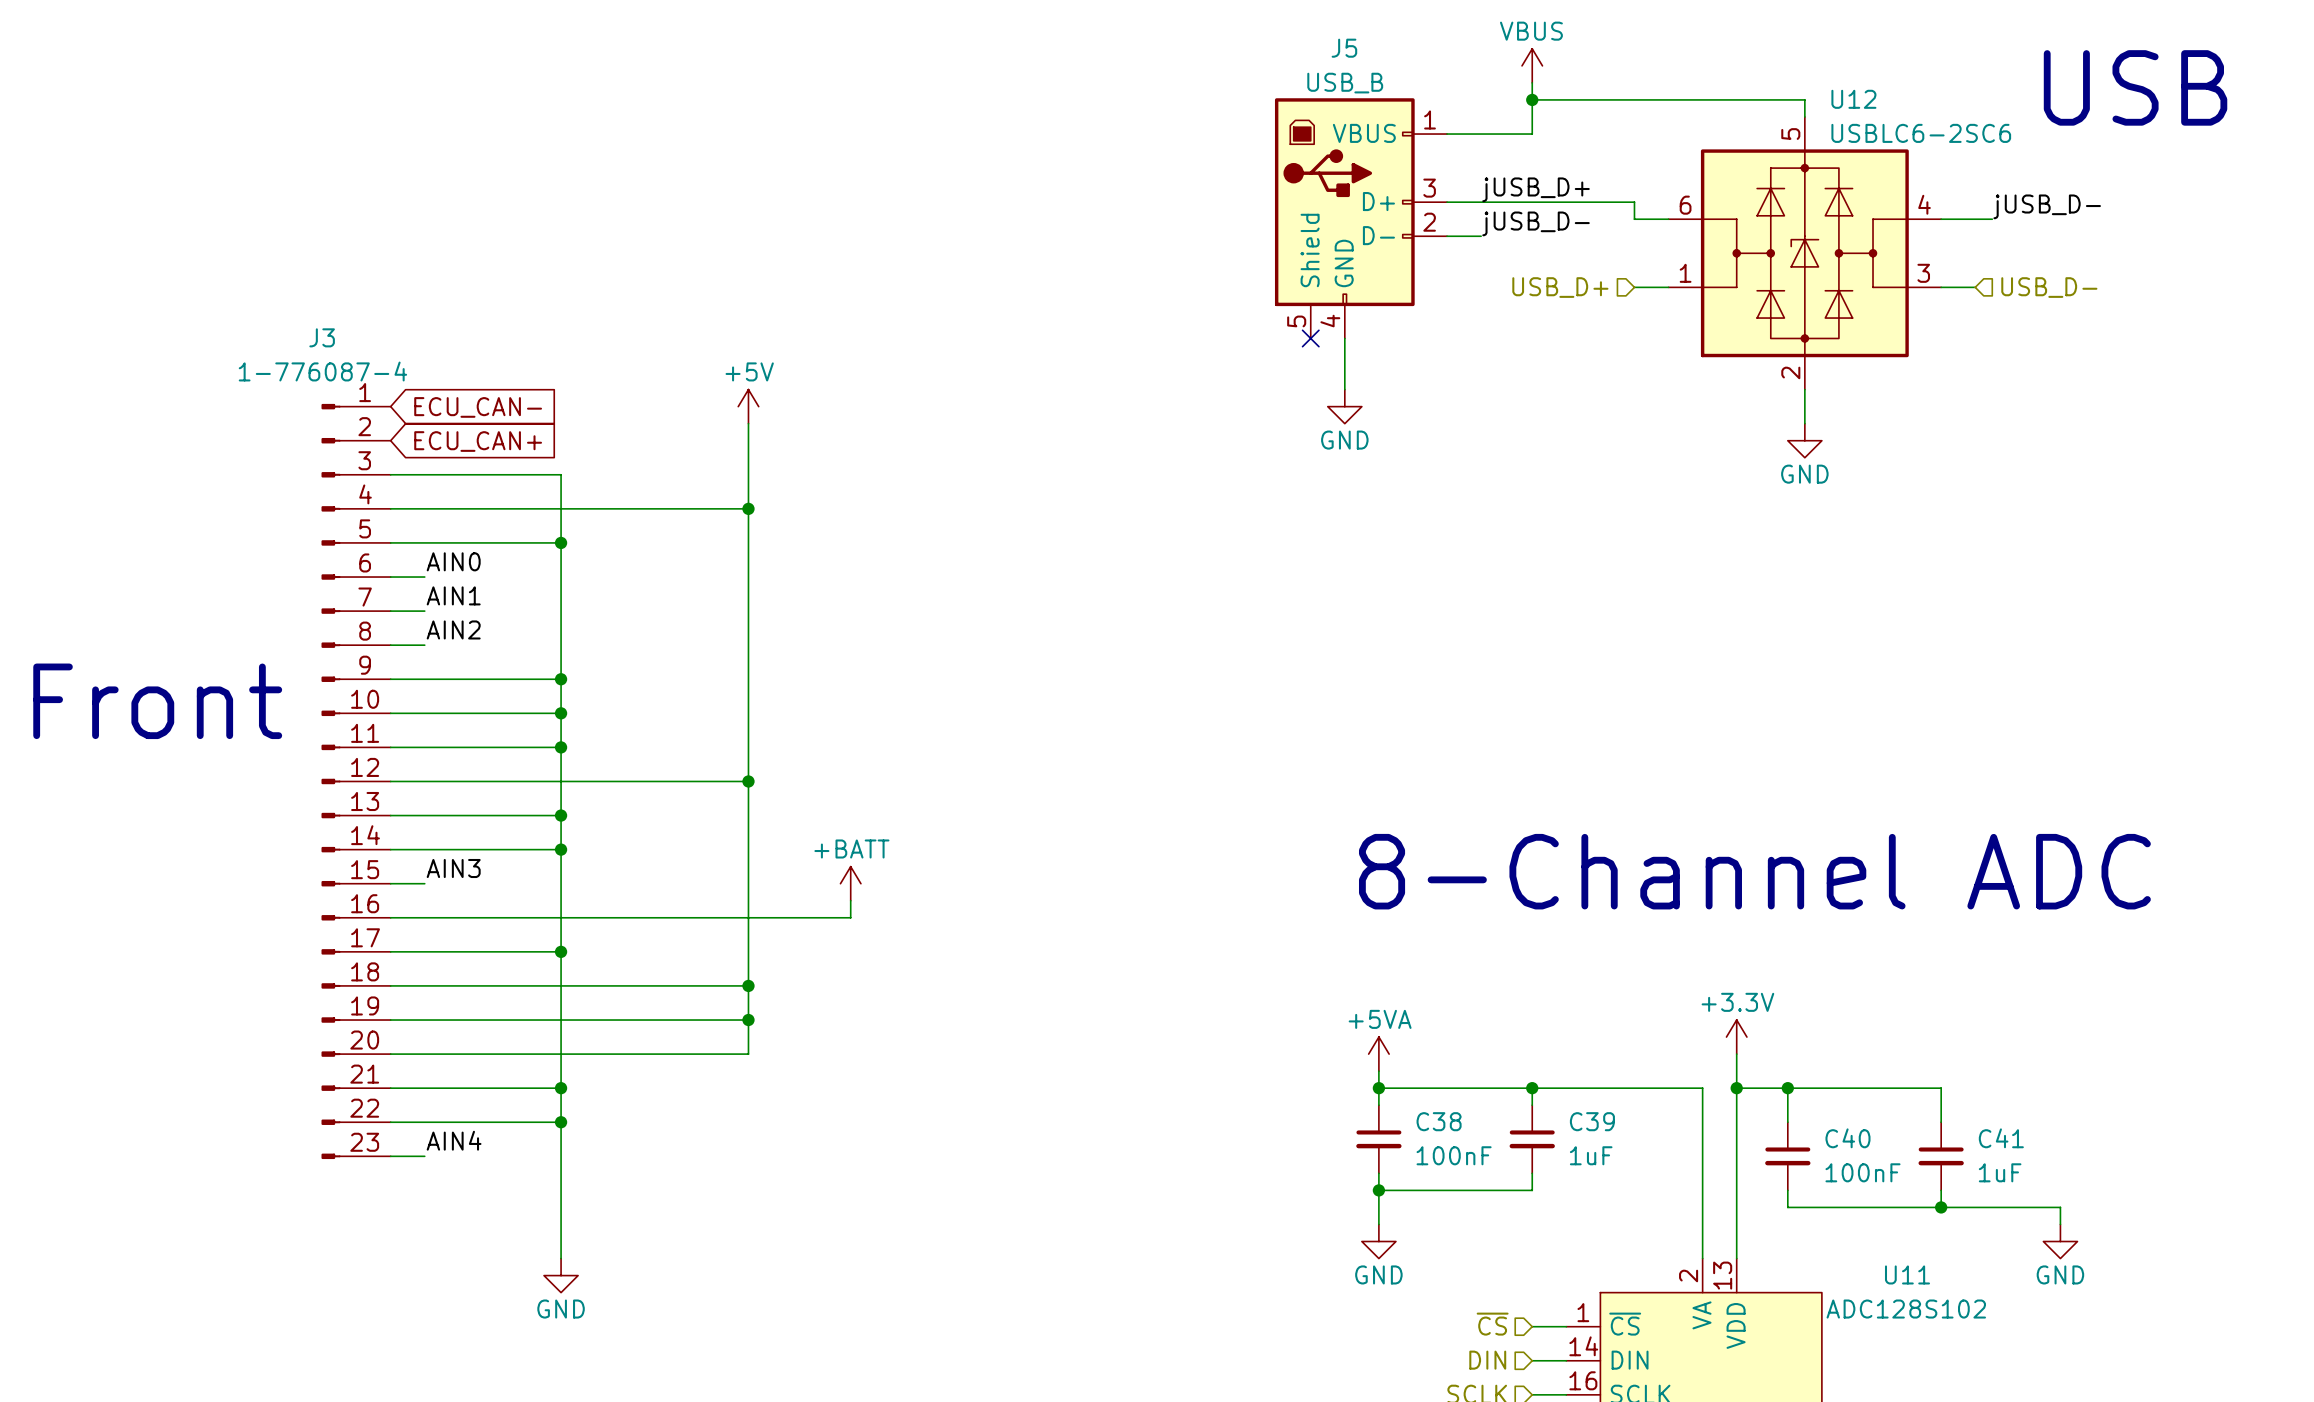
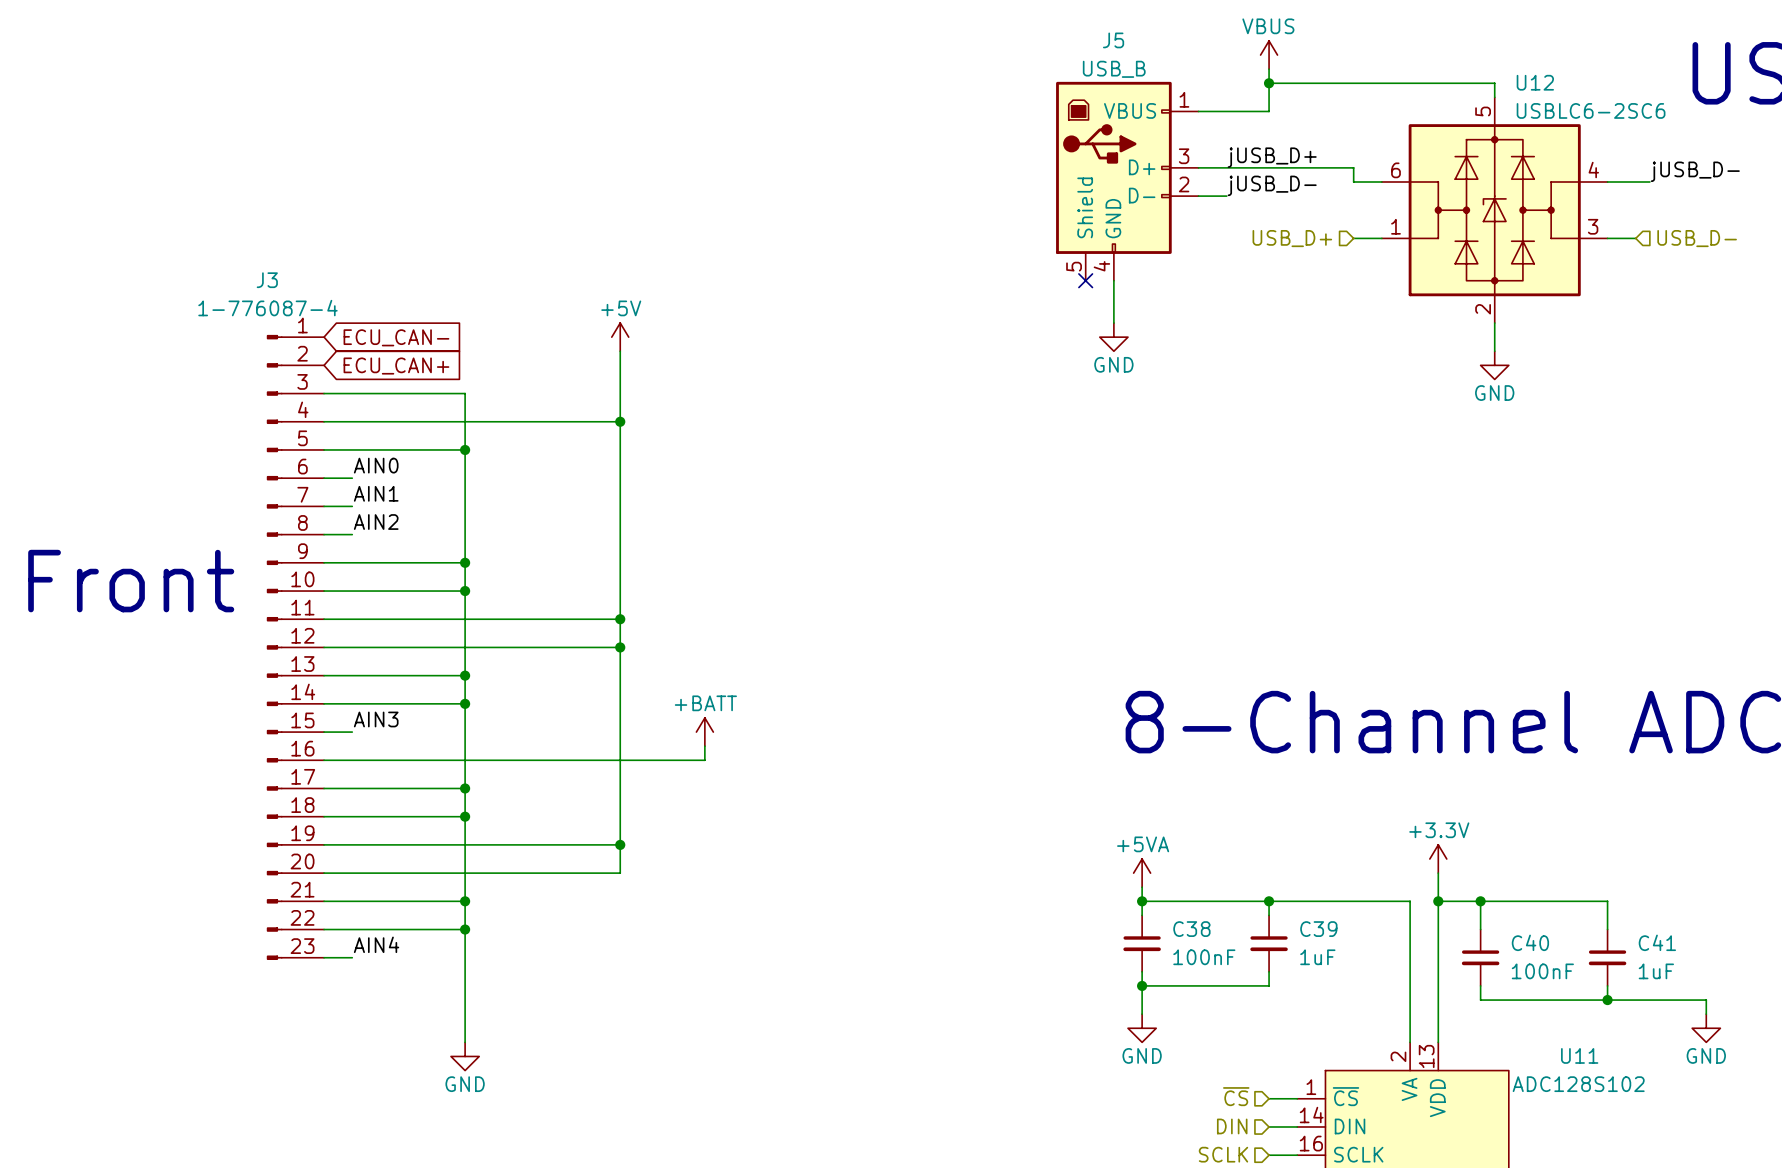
junction: (561, 747) -> none
junction: none -> (620, 619)
wire: (561, 985) (748, 985) -> (465, 619) (620, 619)
junction: none -> (465, 816)
junction: (748, 985) -> none

